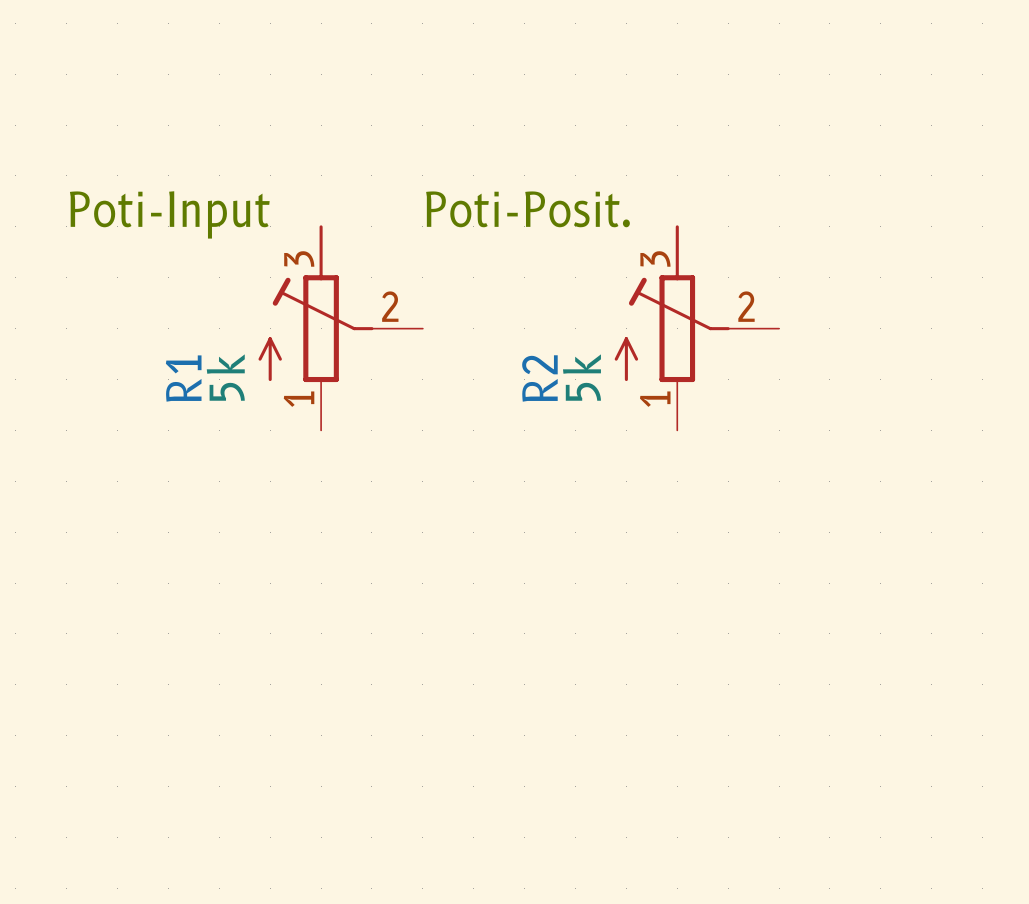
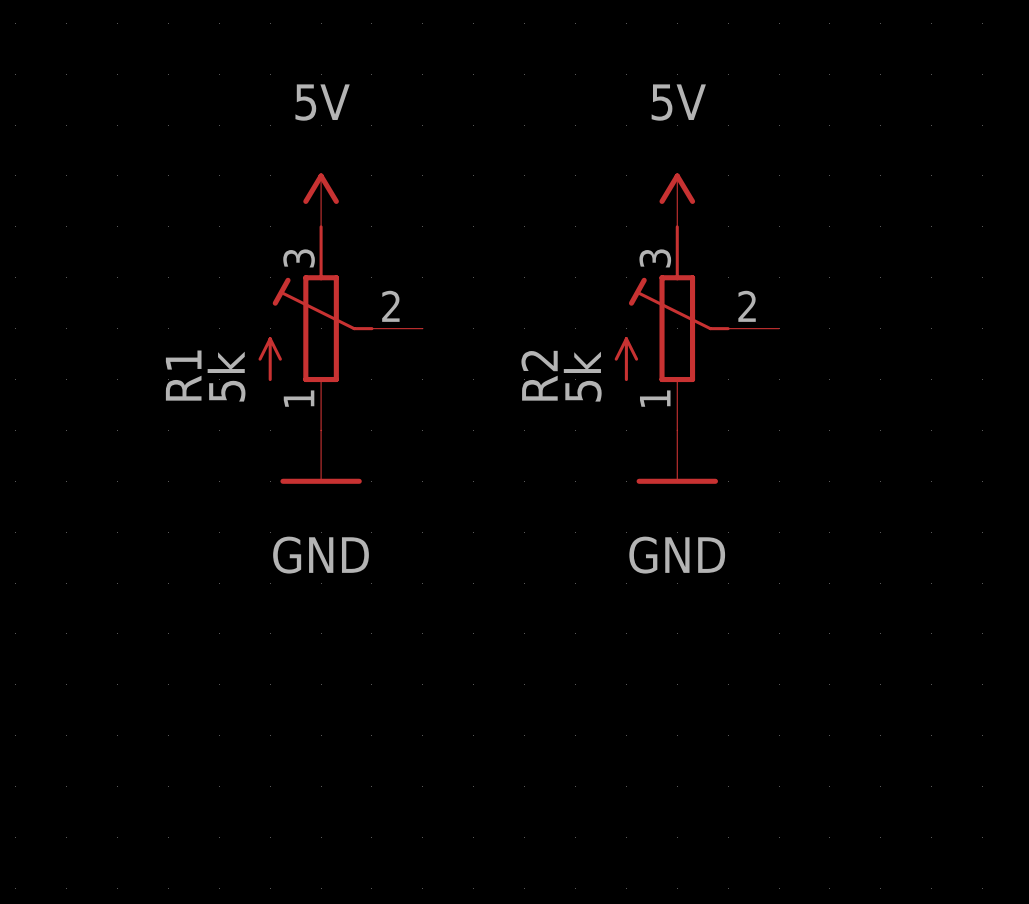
power symbol: none -> 5V (321, 200)
power symbol: none -> 5V (677, 200)
text: Poti-Posit. (527, 209) -> none
text: Poti-Input (169, 214) -> none
power symbol: none -> GND (321, 457)
power symbol: none -> GND (677, 457)

